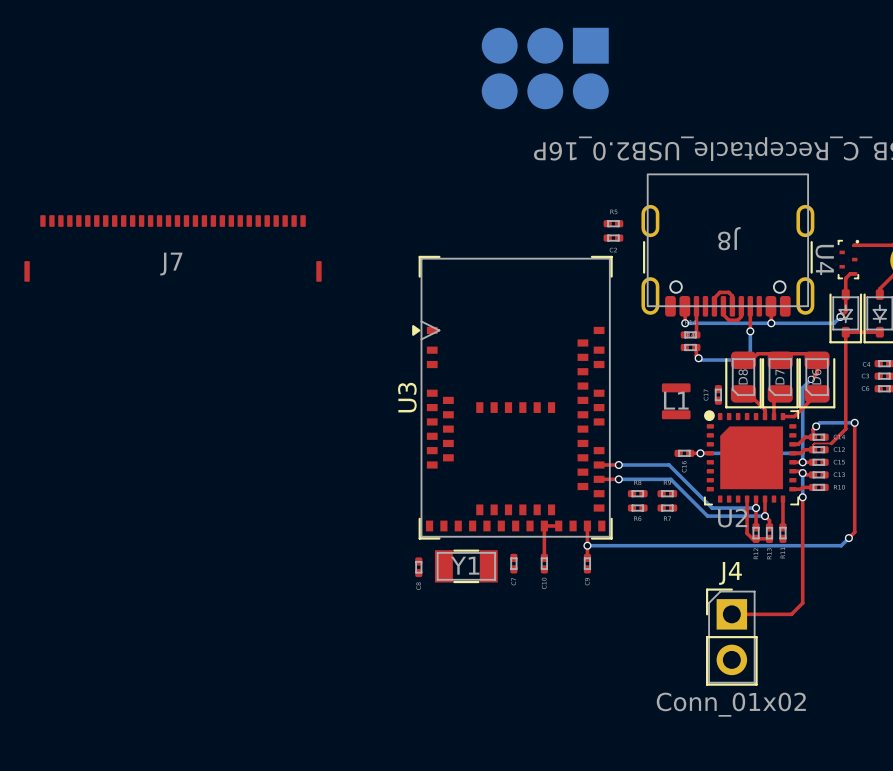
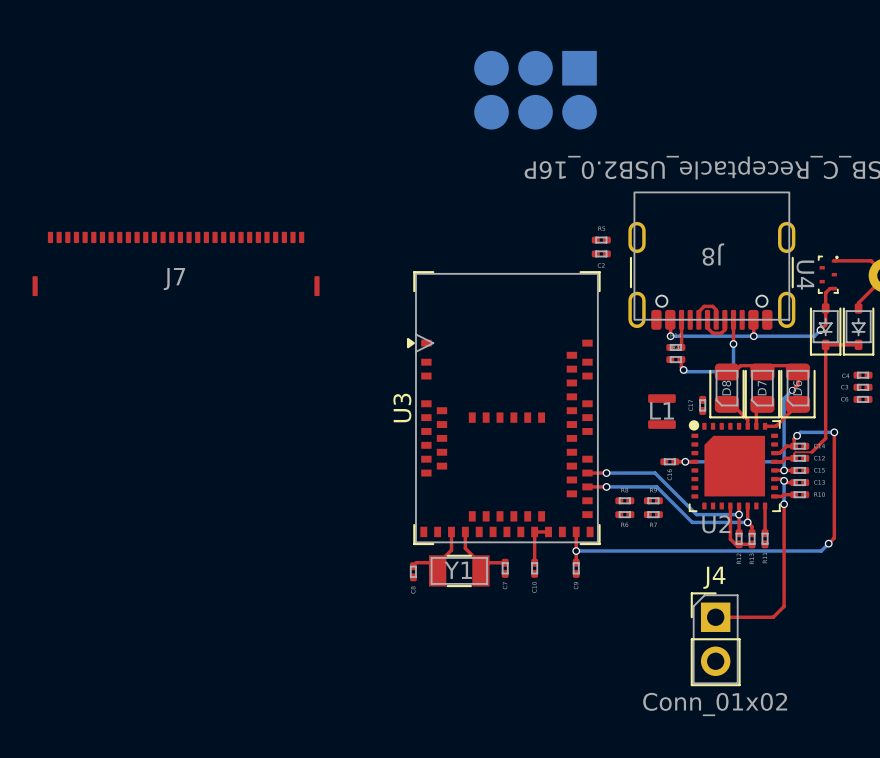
top track: none -> (451, 531) (451, 550) (437, 564) (437, 570) (429, 562) (415, 562)
top track: none -> (465, 531) (465, 548) (480, 564) (480, 570) (489, 562) (502, 562)

